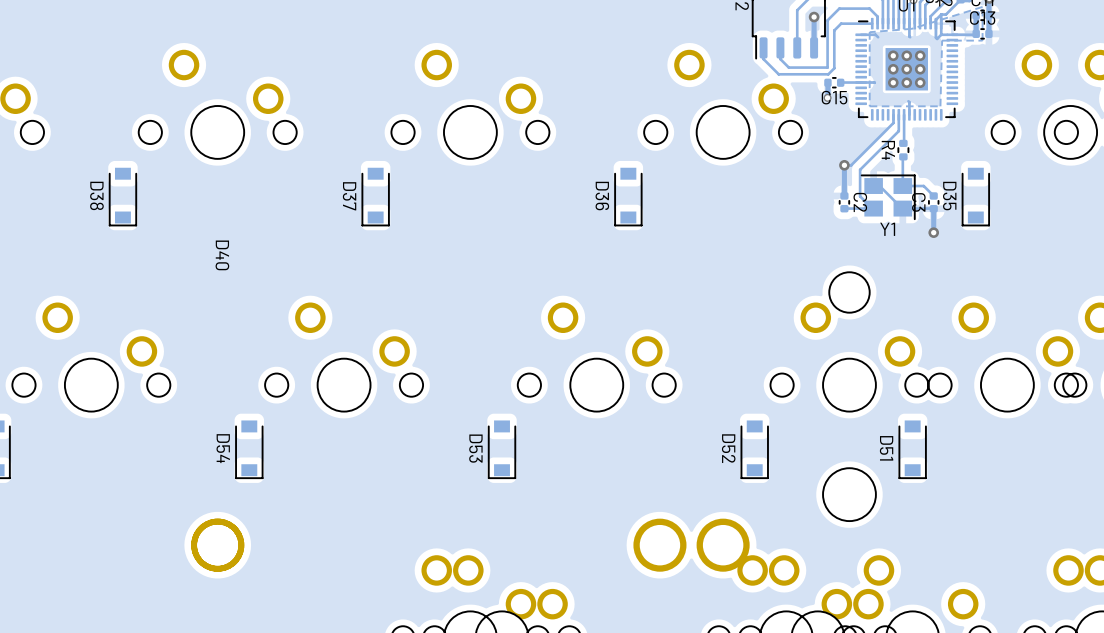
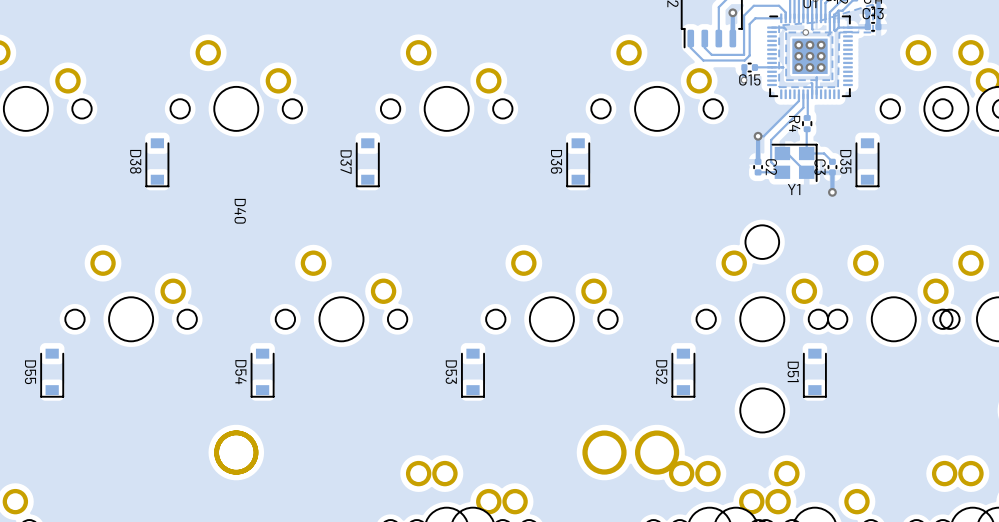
track: none -> (829, 18) (828, 35)
via: none -> (805, 32)
zone outline: none -> (832, 32) (832, 80) (786, 80) (786, 32) (832, 32)
track: none -> (817, 77) (816, 94)

